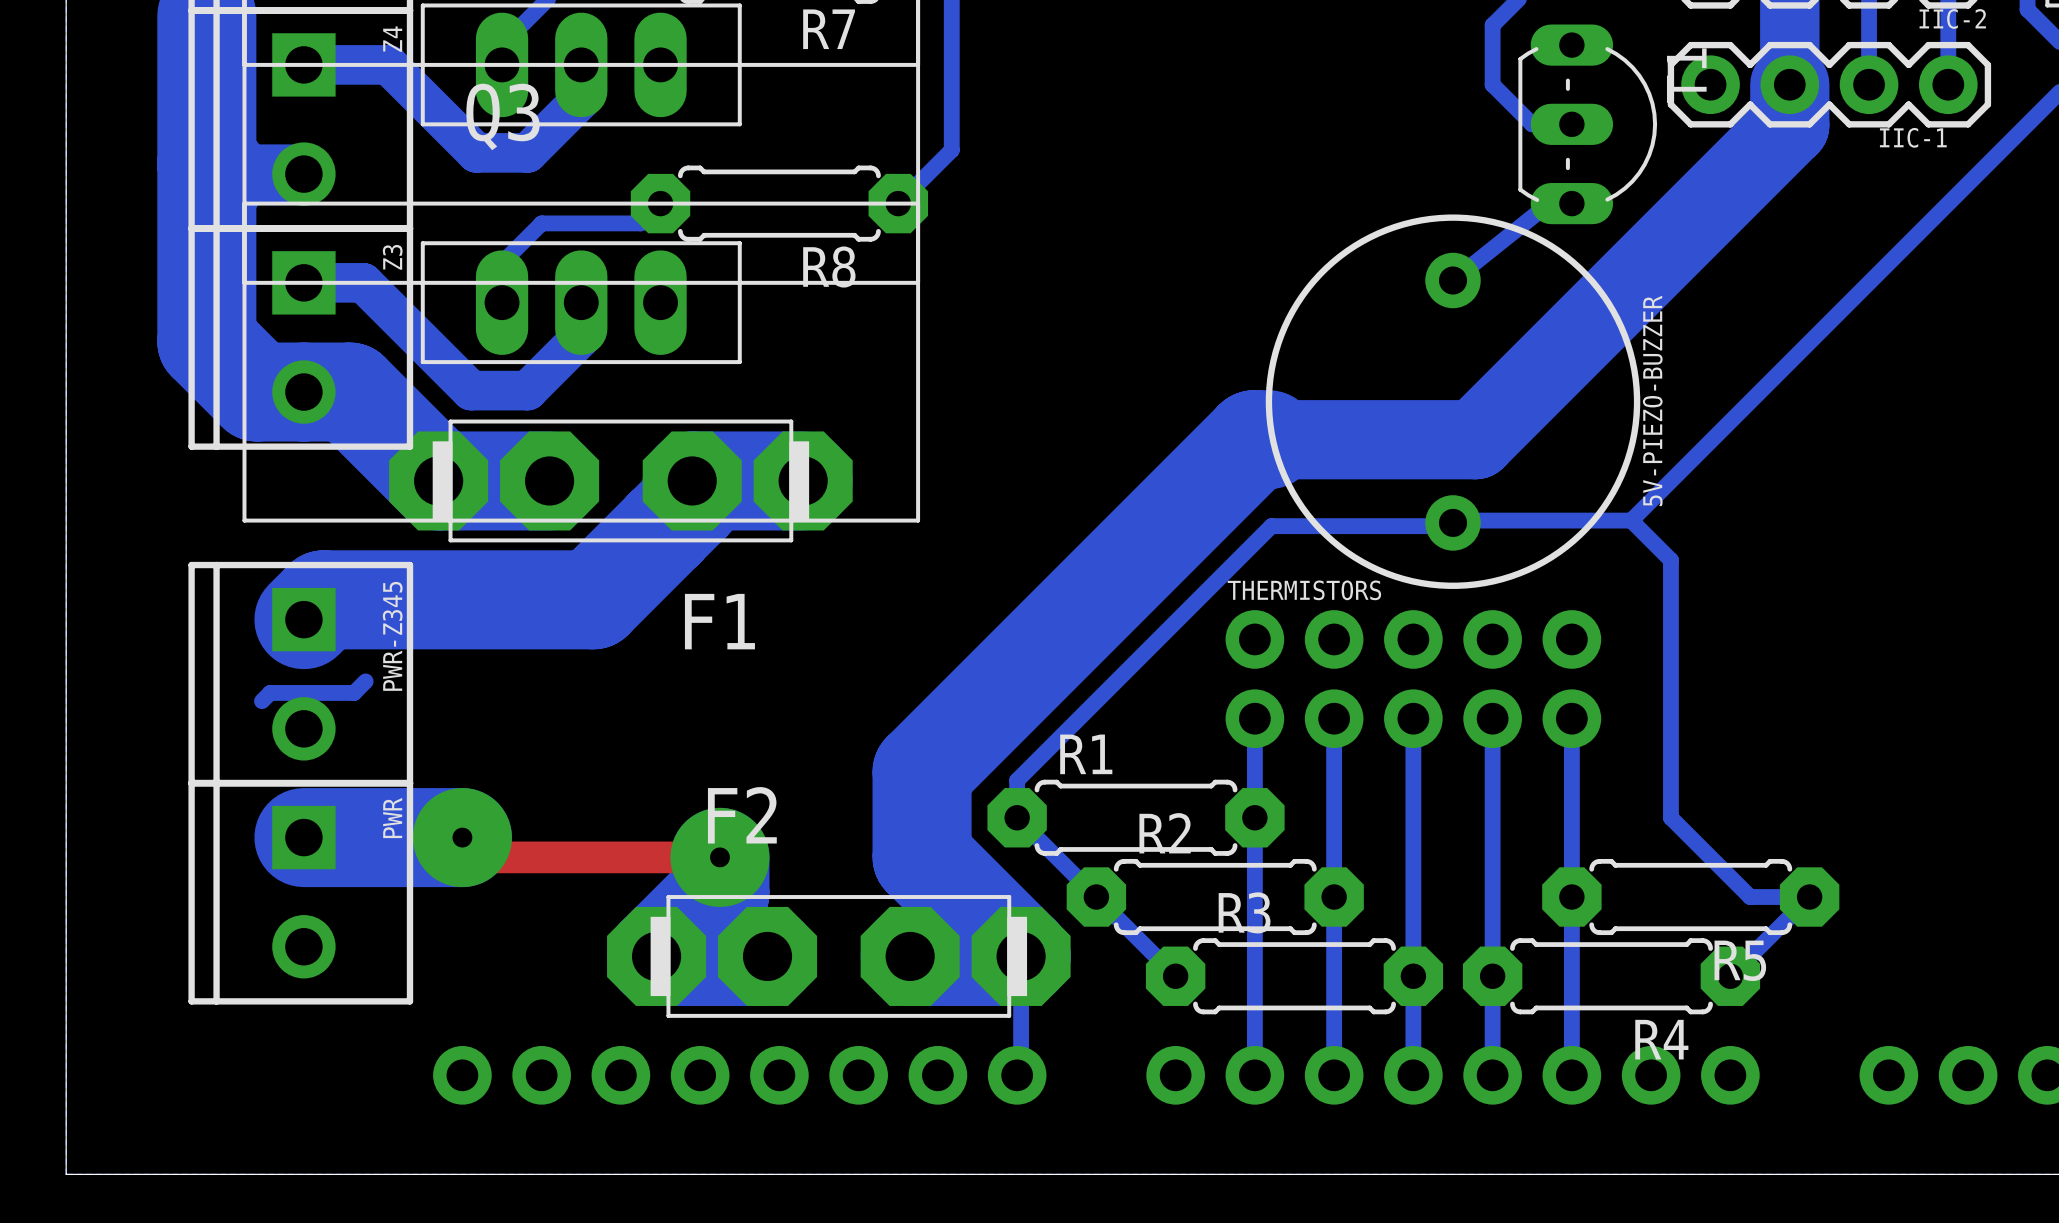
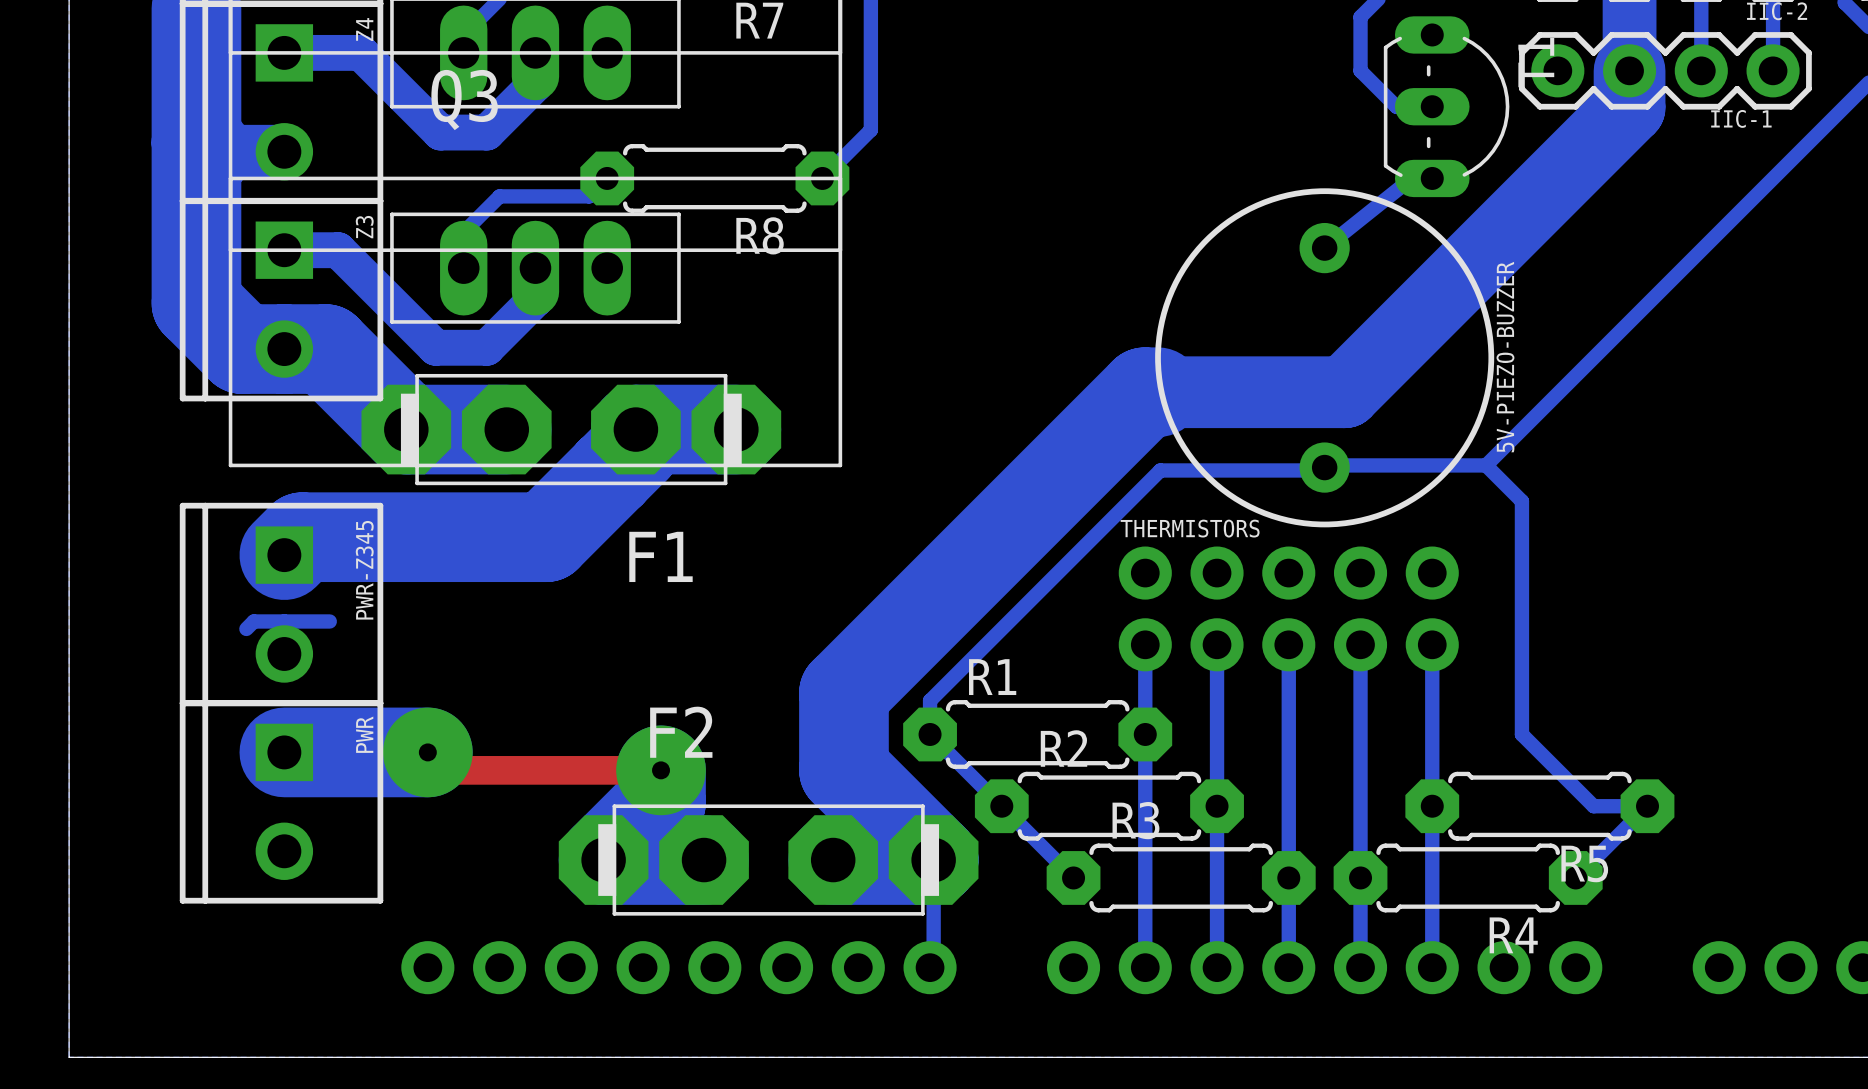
bottom track: (365, 681) (354, 692) -> none

